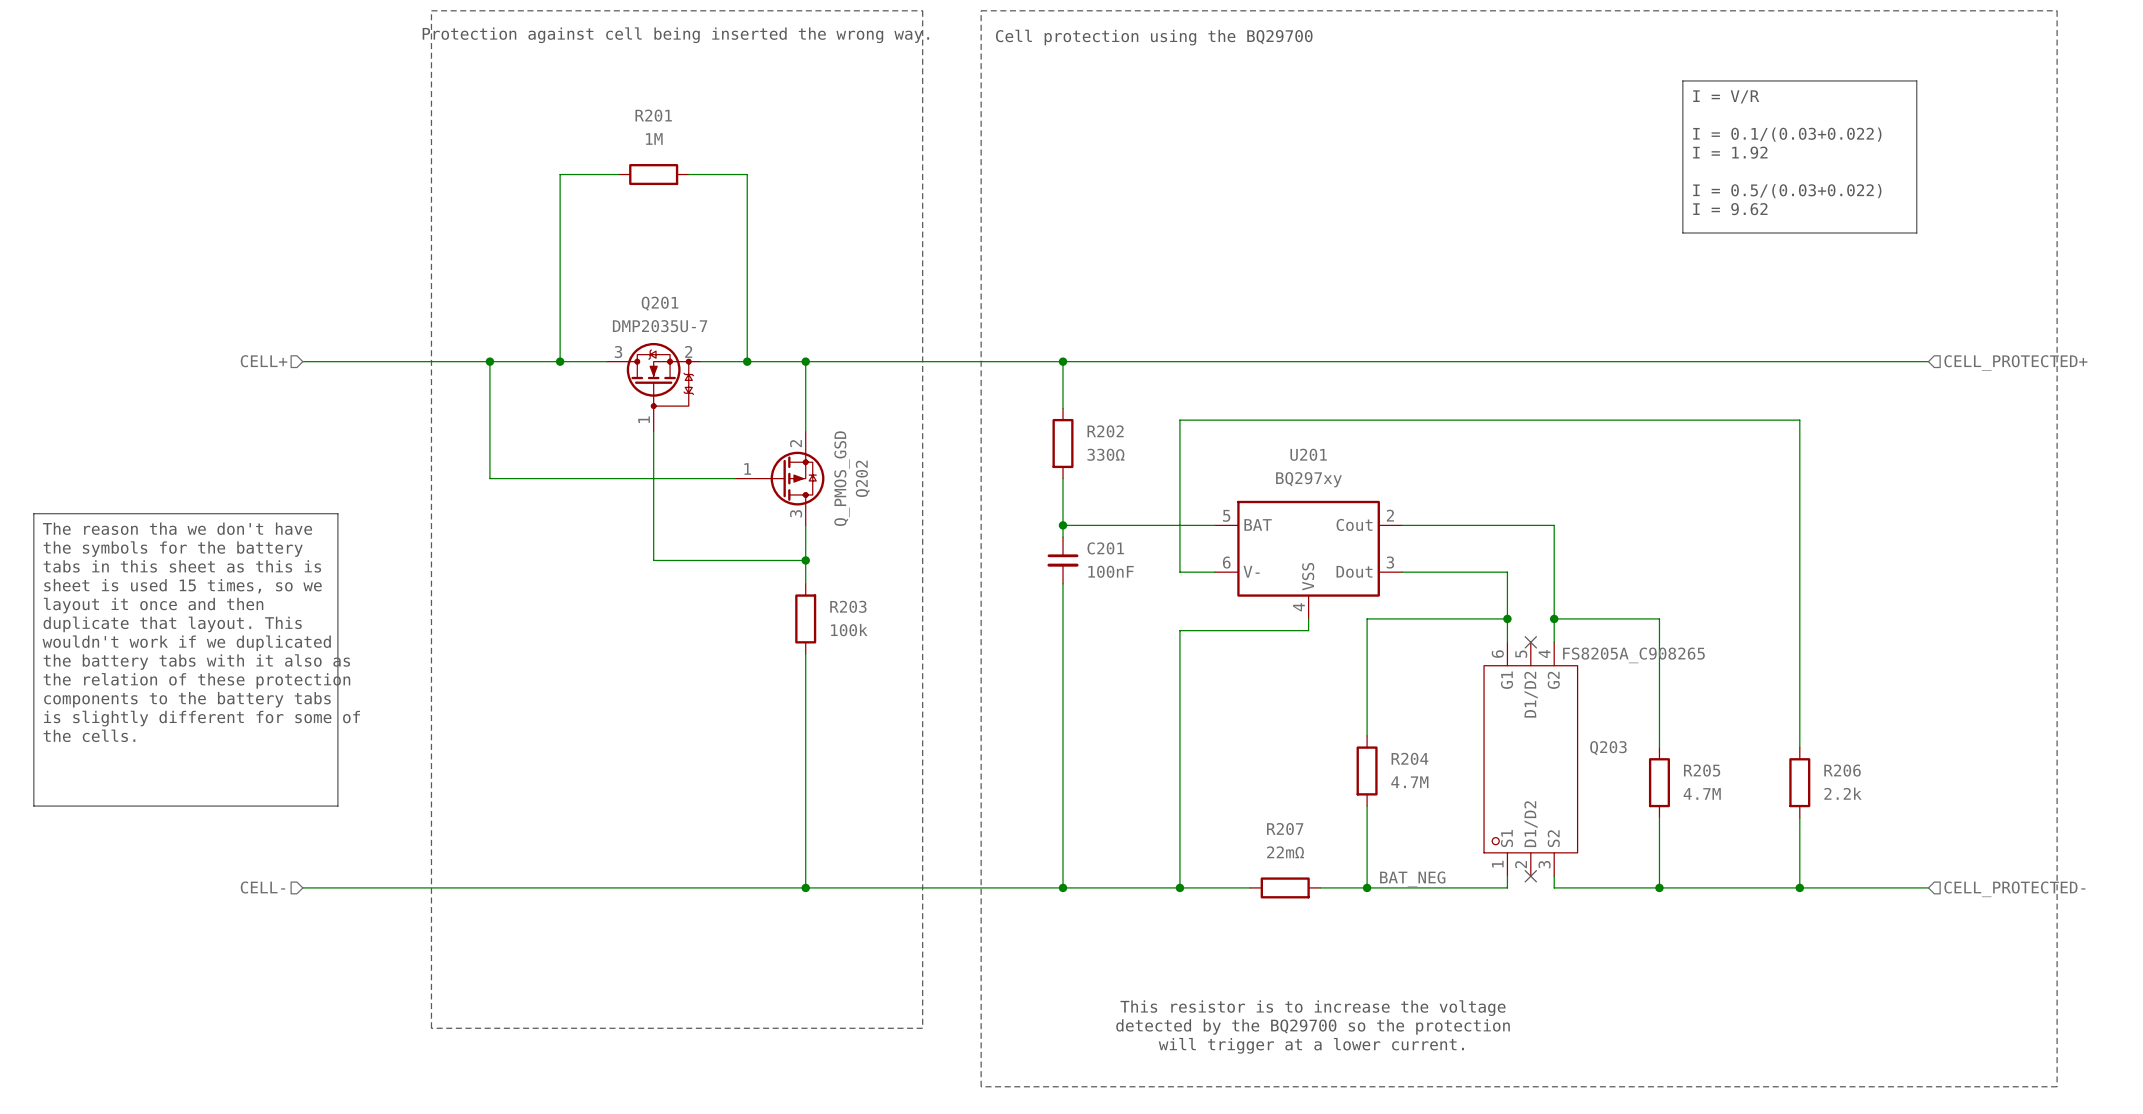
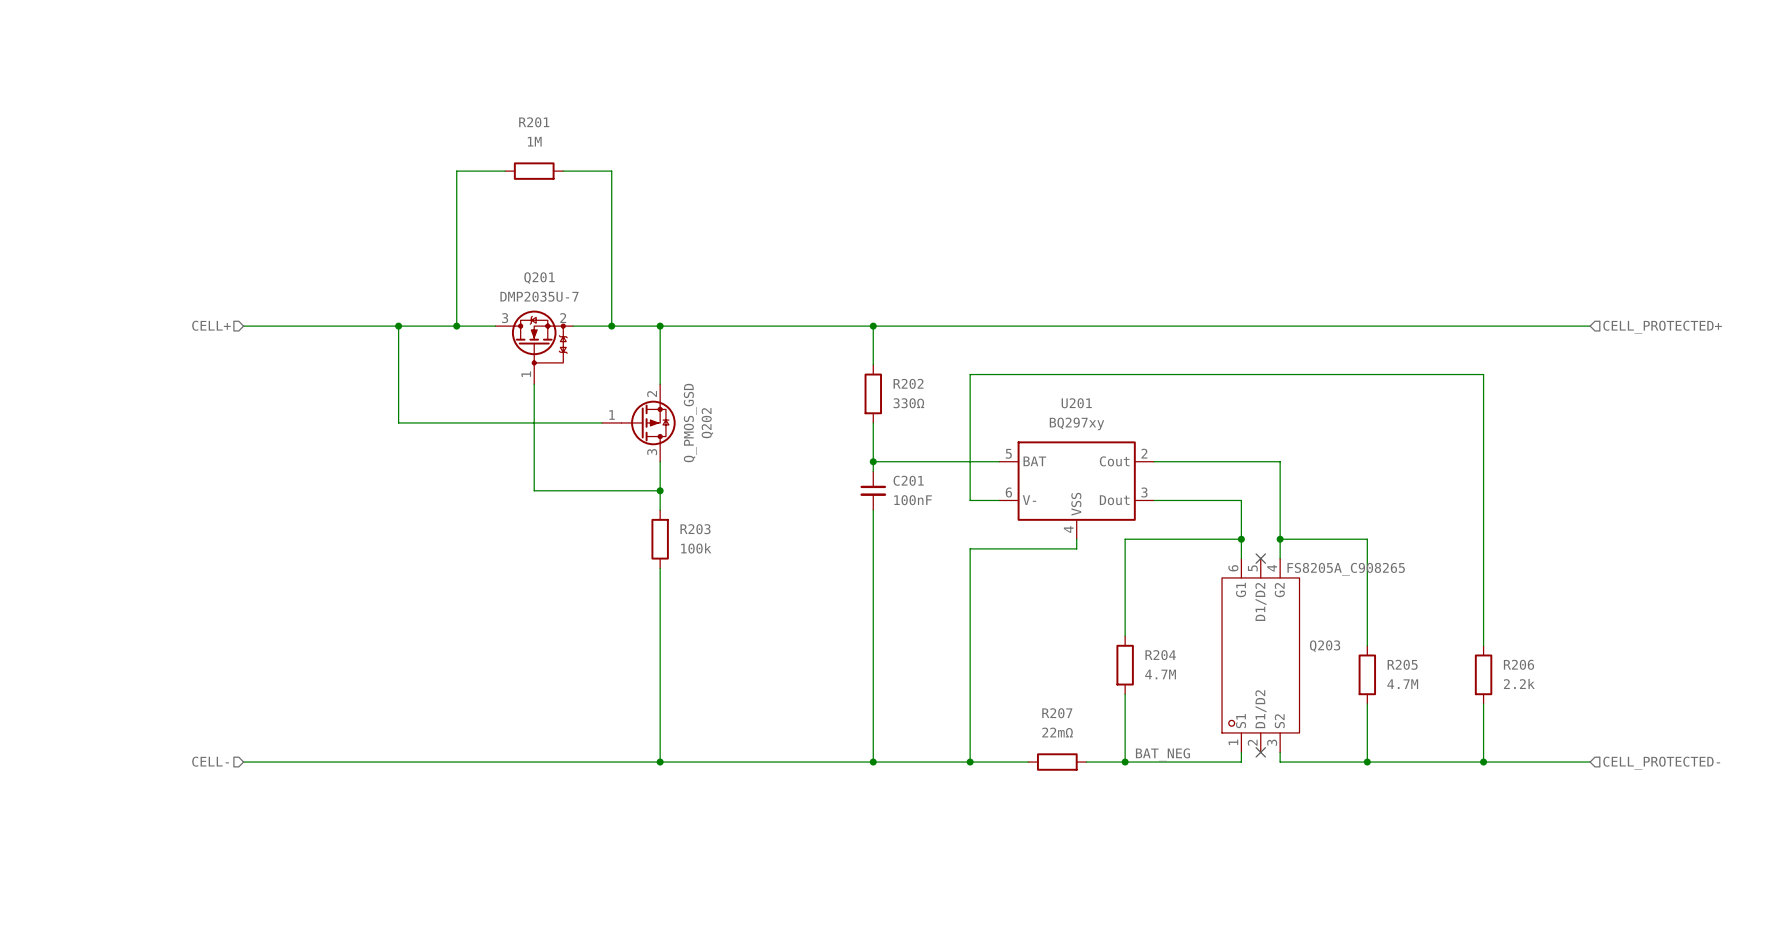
line: (431, 10) (922, 10) (922, 1028) (431, 1028) (431, 10) -> none
line: (981, 10) (2057, 10) (2057, 1086) (981, 1086) (981, 10) -> none
text: Protection against cell being inserted the wrong way. (675, 35) -> none
text: Cell protection using the BQ29700 (1154, 37) -> none
line: (1682, 80) (1916, 80) (1916, 233) (1682, 233) (1682, 80) -> none
text: I = V/R (1726, 96) -> none
text: I = 0.1/(0.03+0.022) (1787, 134) -> none
text: I = 1.92 (1730, 152) -> none
text: I = 0.5/(0.03+0.022) (1787, 191) -> none
text: I = 9.62 (1730, 209) -> none
line: (33, 513) (337, 513) (337, 806) (33, 806) (33, 513) -> none
text: The reason tha we don't have (177, 528) -> none
text: the symbols for the battery (173, 549) -> none
text: tabs in this sheet as this is (182, 566) -> none
text: sheet is used 15 times, so we (183, 586) -> none
text: layout it once and then (153, 605) -> none
text: duplicate that layout. This (172, 624) -> none
text: wouldn't work if we duplicated (186, 643) -> none
text: the battery tabs with it also as (196, 662) -> none
text: the relation of these protection (196, 680) -> none
text: components to the battery tabs (187, 699) -> none
text: is slightly different for some of (201, 718) -> none
text: the cells. (89, 735) -> none
text: This resistor is to increase the voltage (1312, 1008) -> none
text: detected by the BQ29700 so the protection (1313, 1026) -> none
text: will trigger at a lower current. (1311, 1045) -> none

